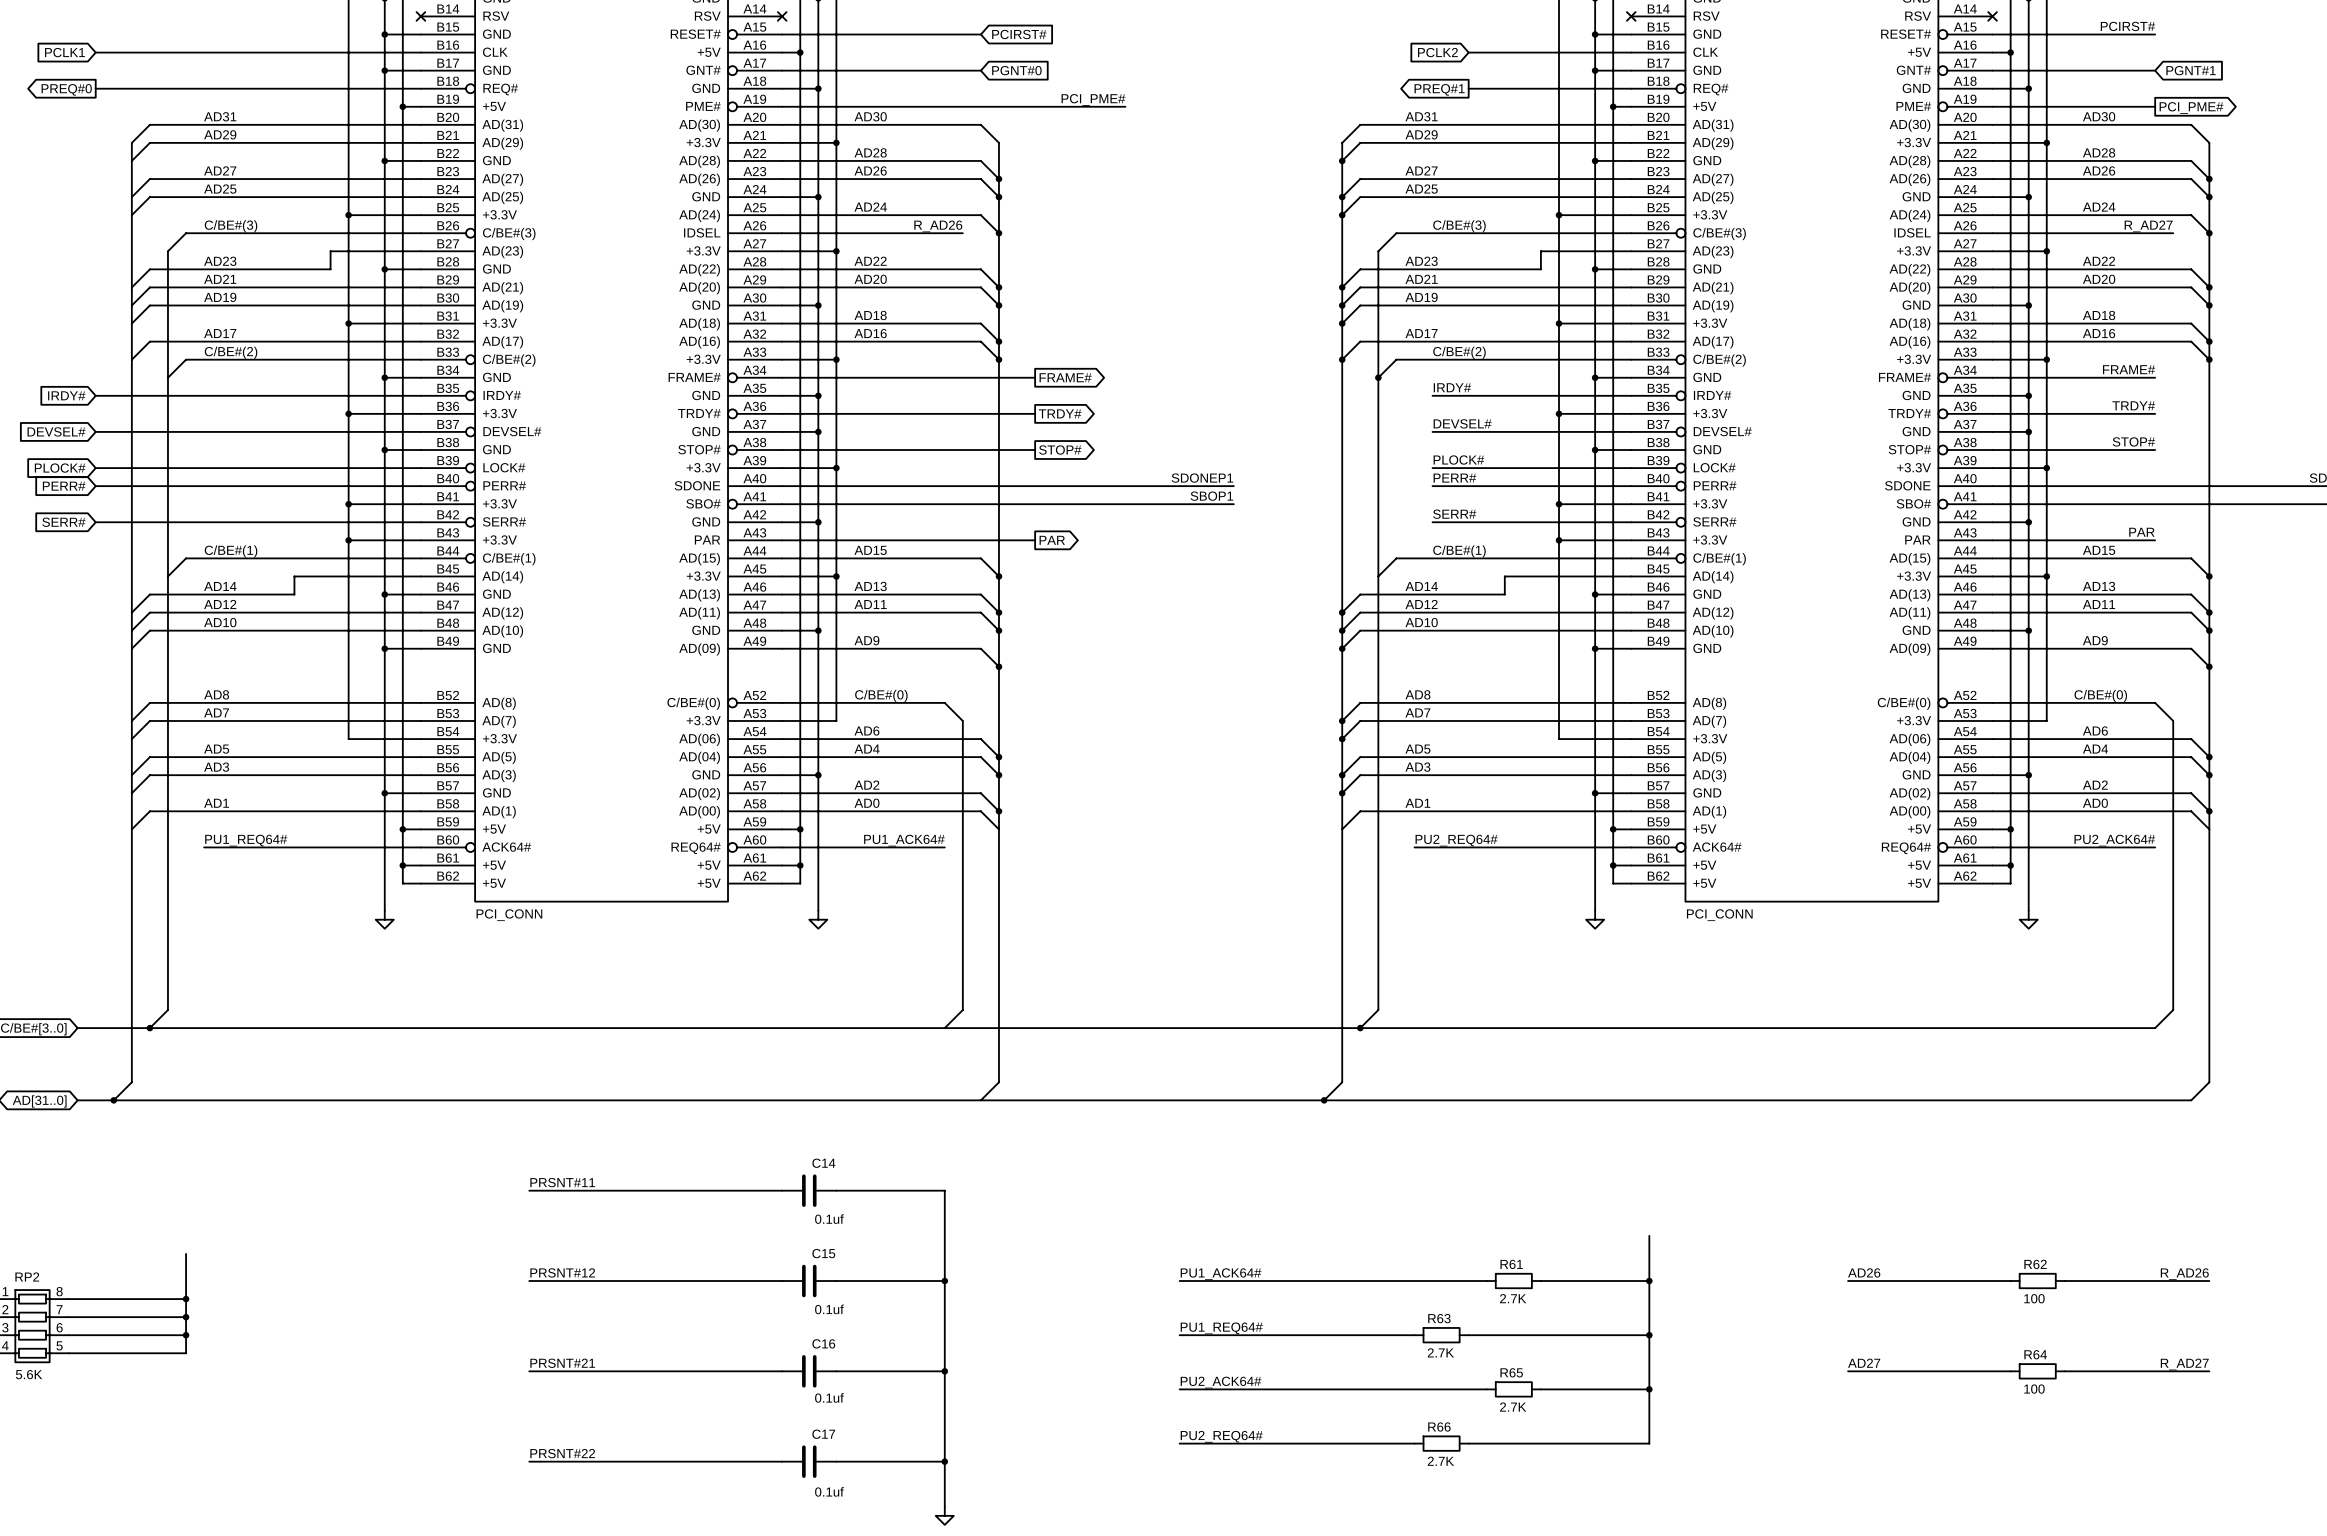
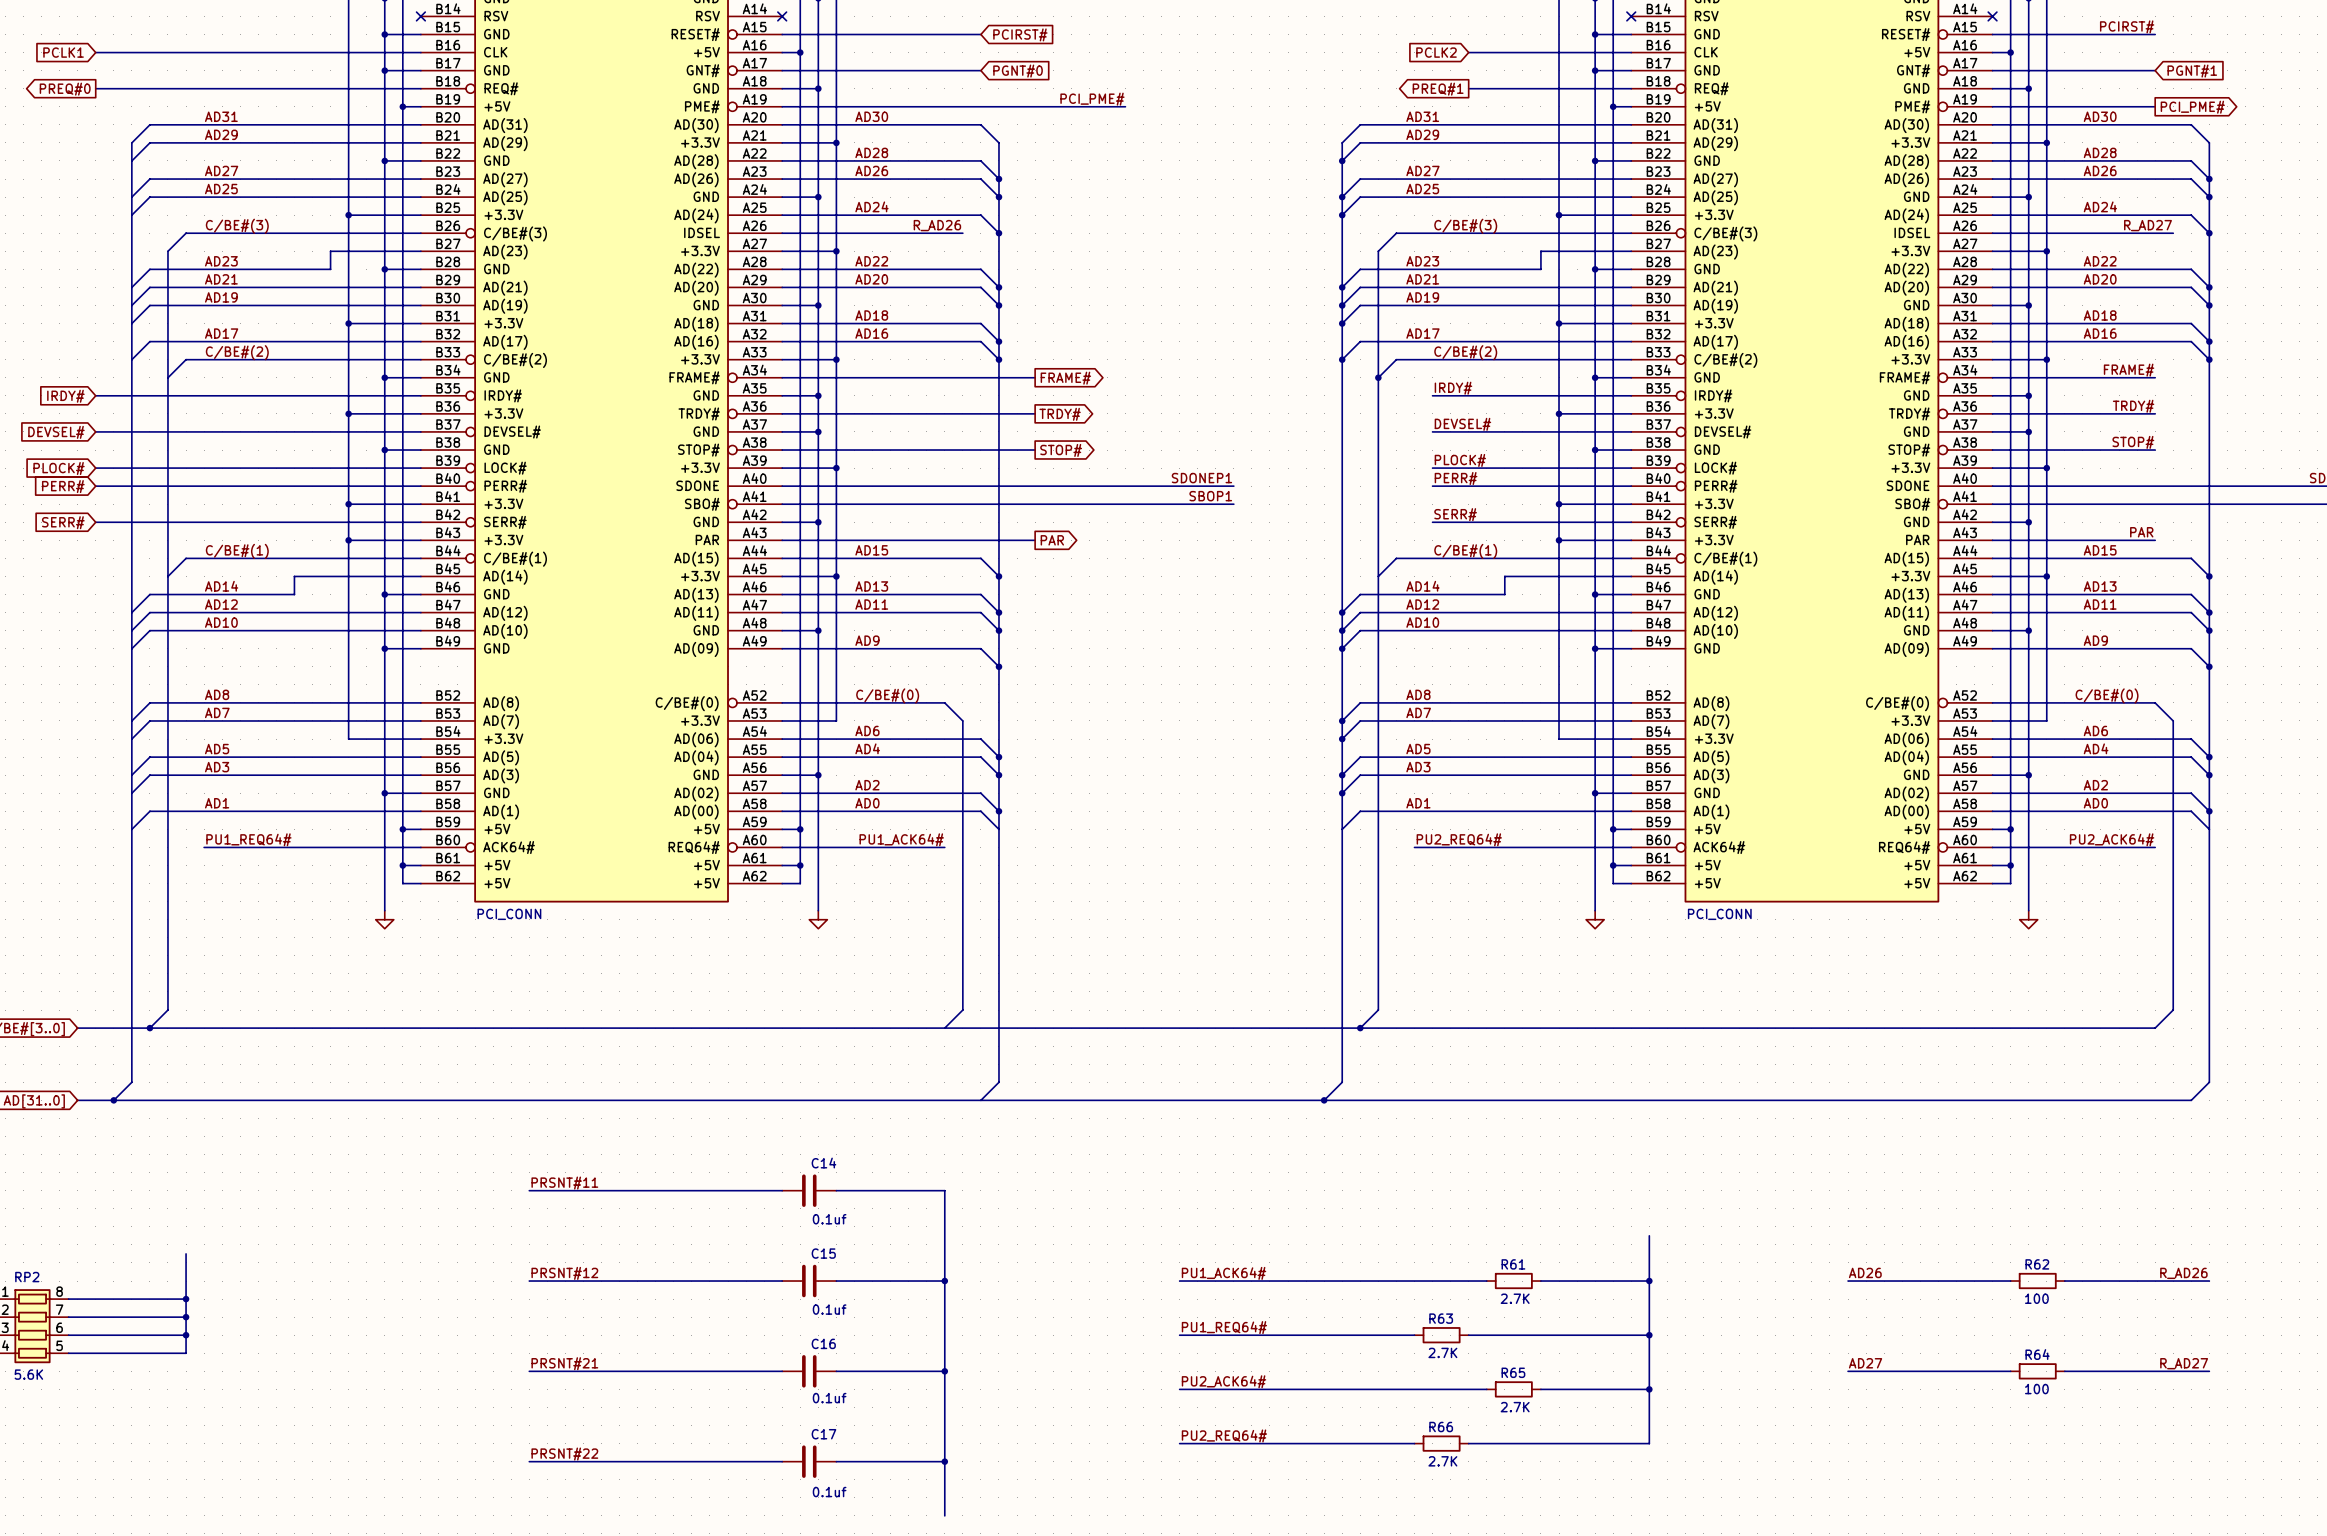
power symbol: (944, 1515) -> none

